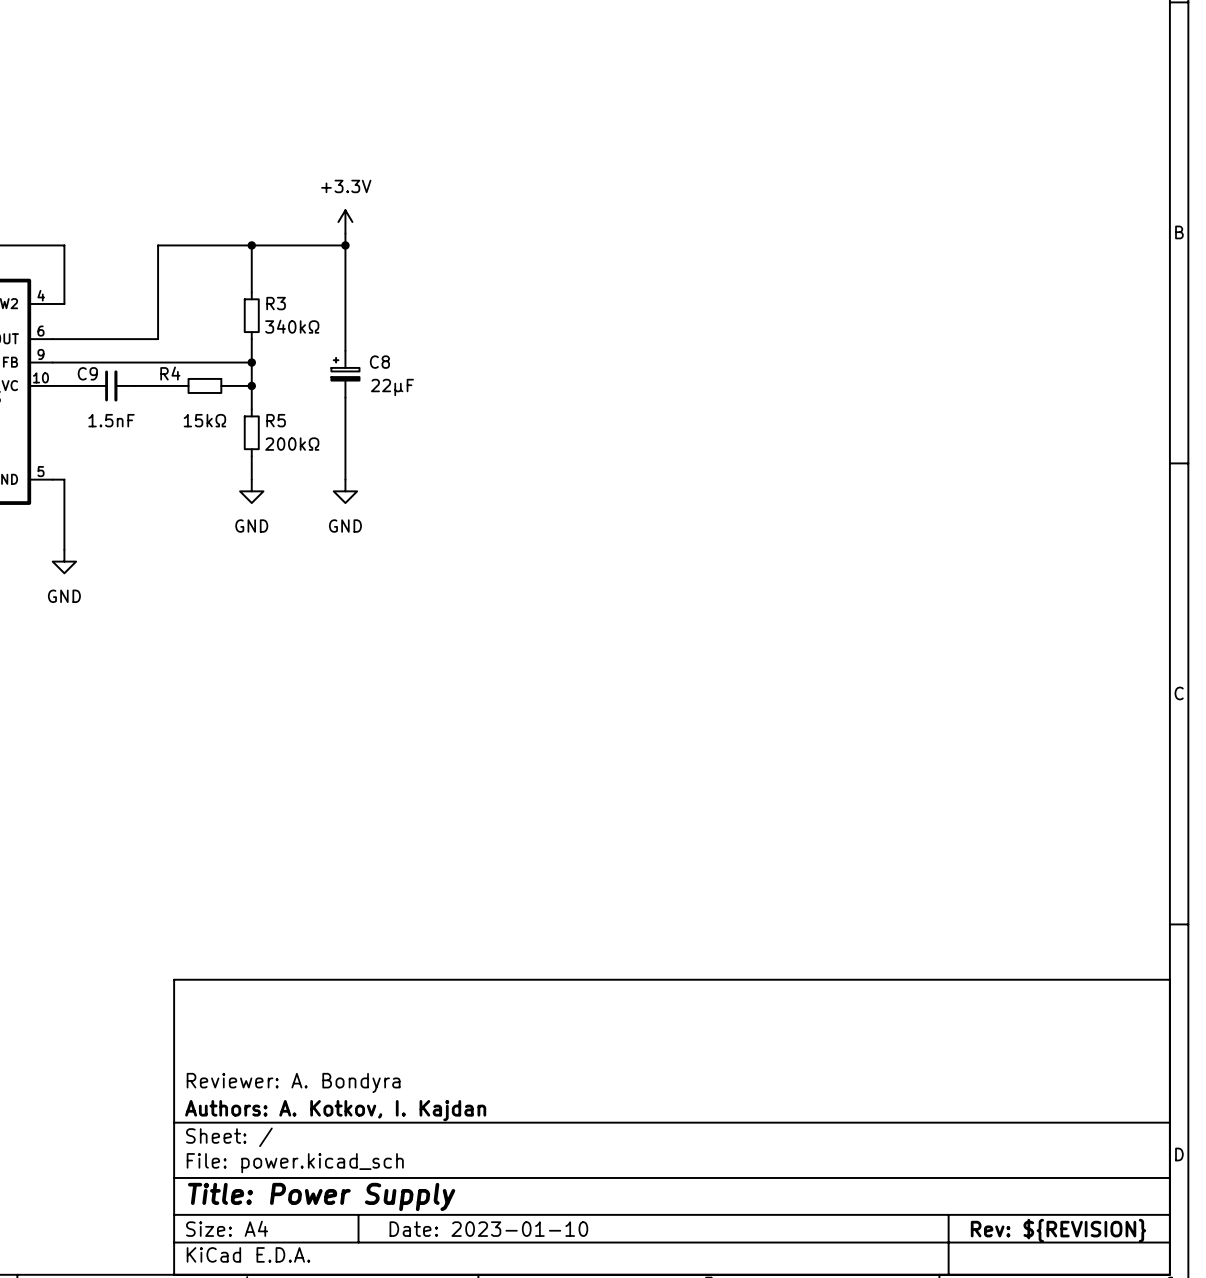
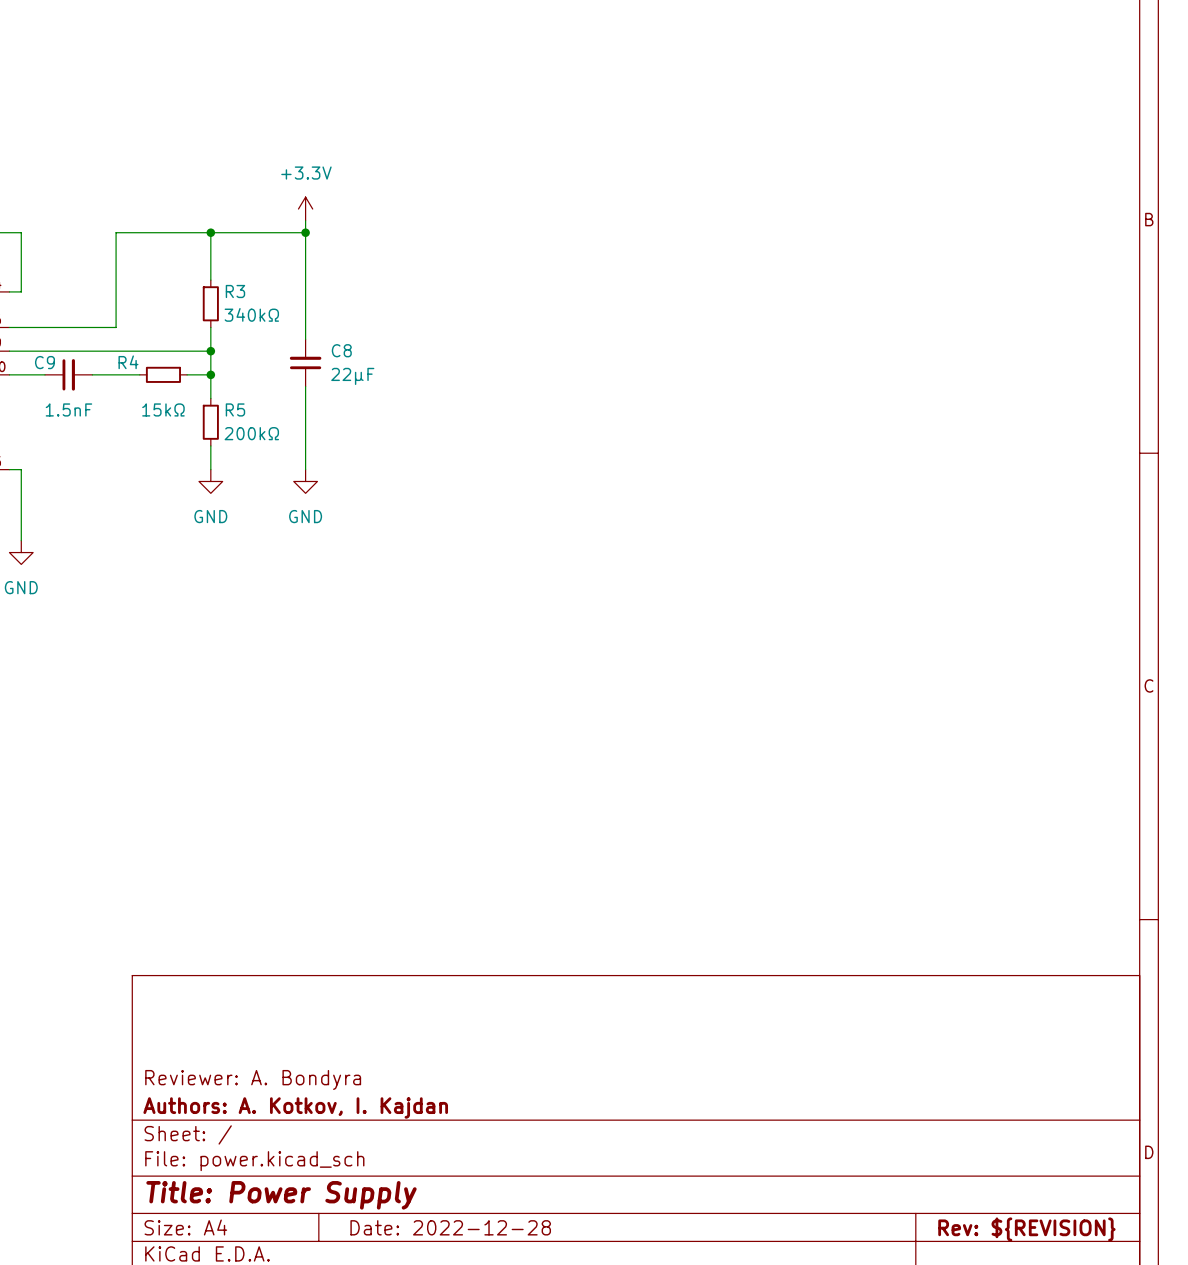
C8 symbol: [331, 350, 360, 398] -> [289, 339, 322, 387]
title block: Date: 2023-01-10 (488, 1229) -> Date: 2022-12-28 (450, 1227)

